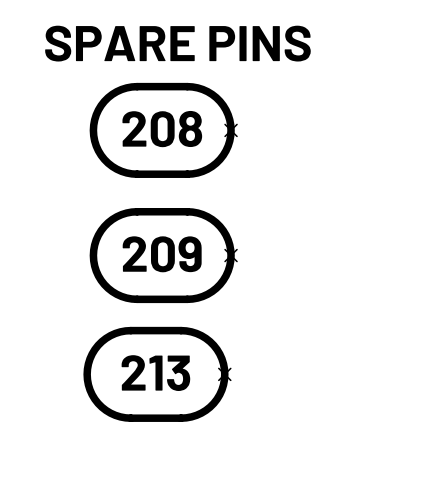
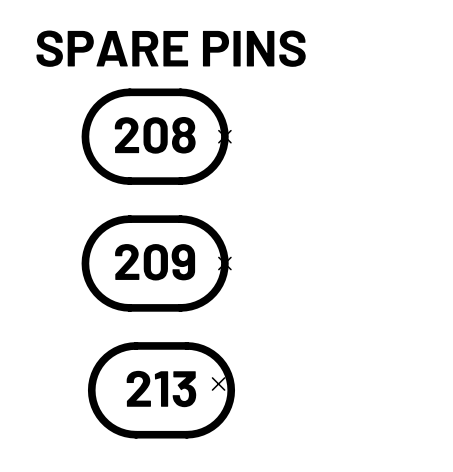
part position: (155, 374) -> (161, 390)

